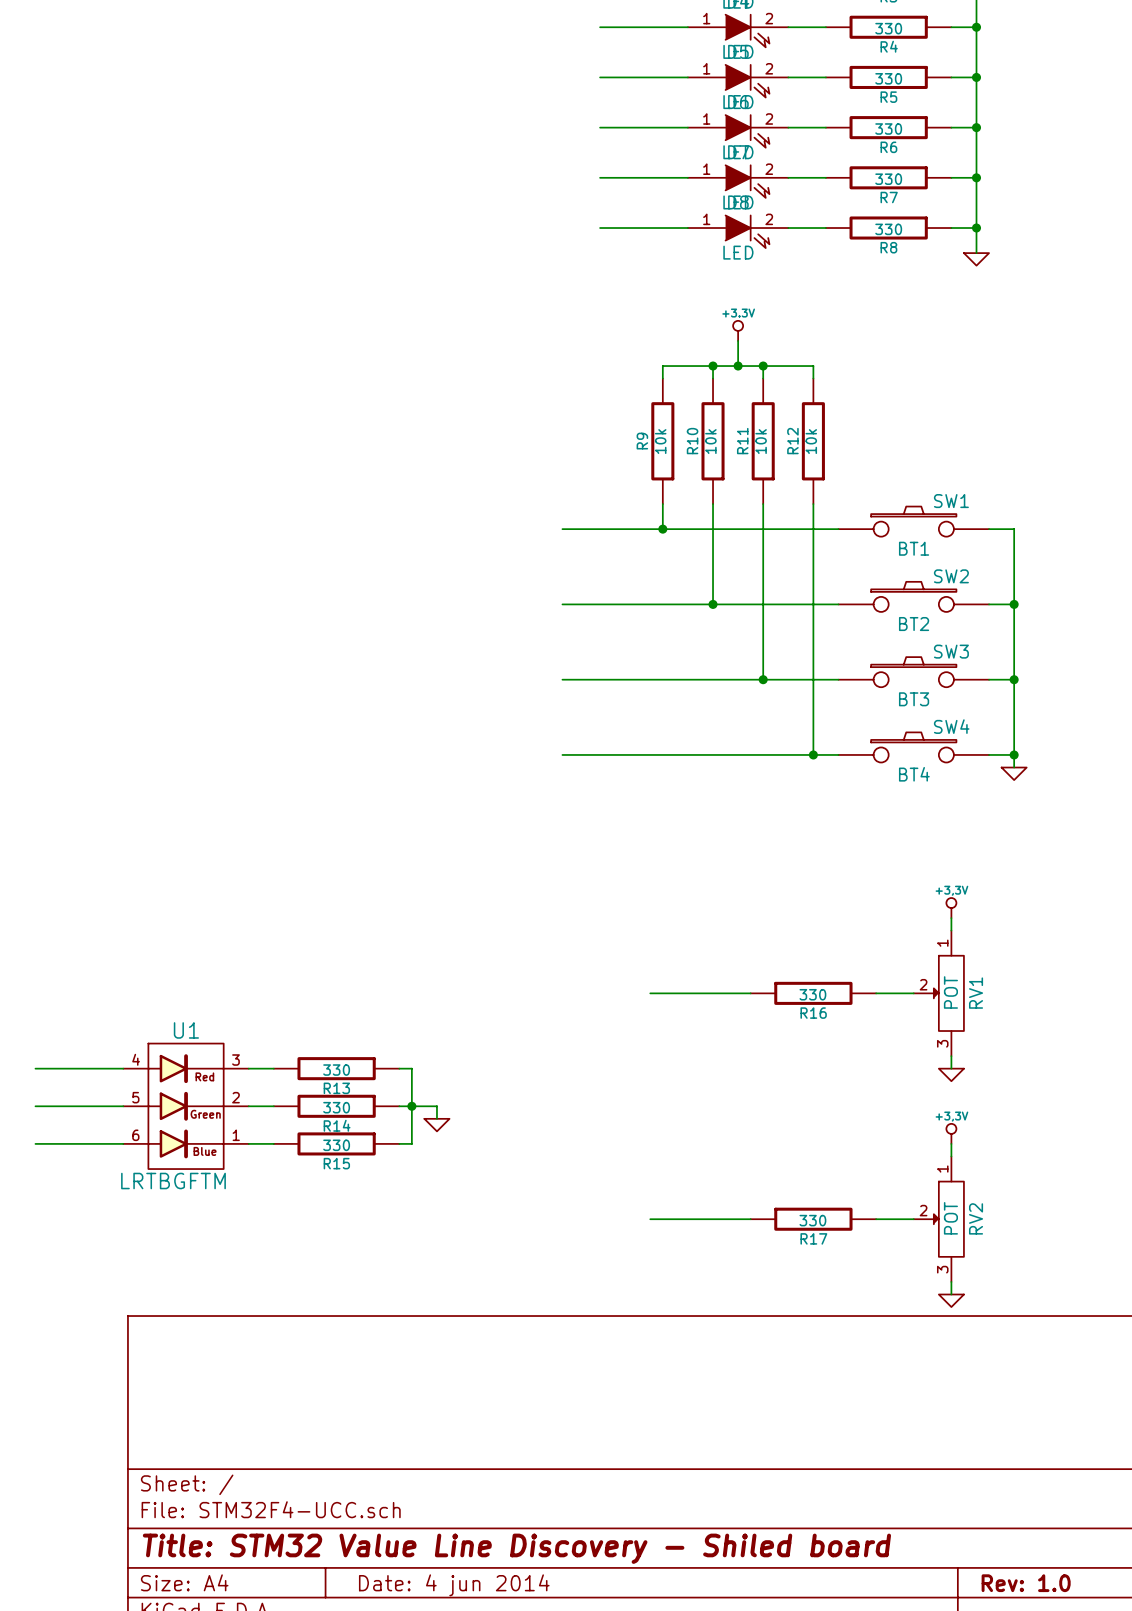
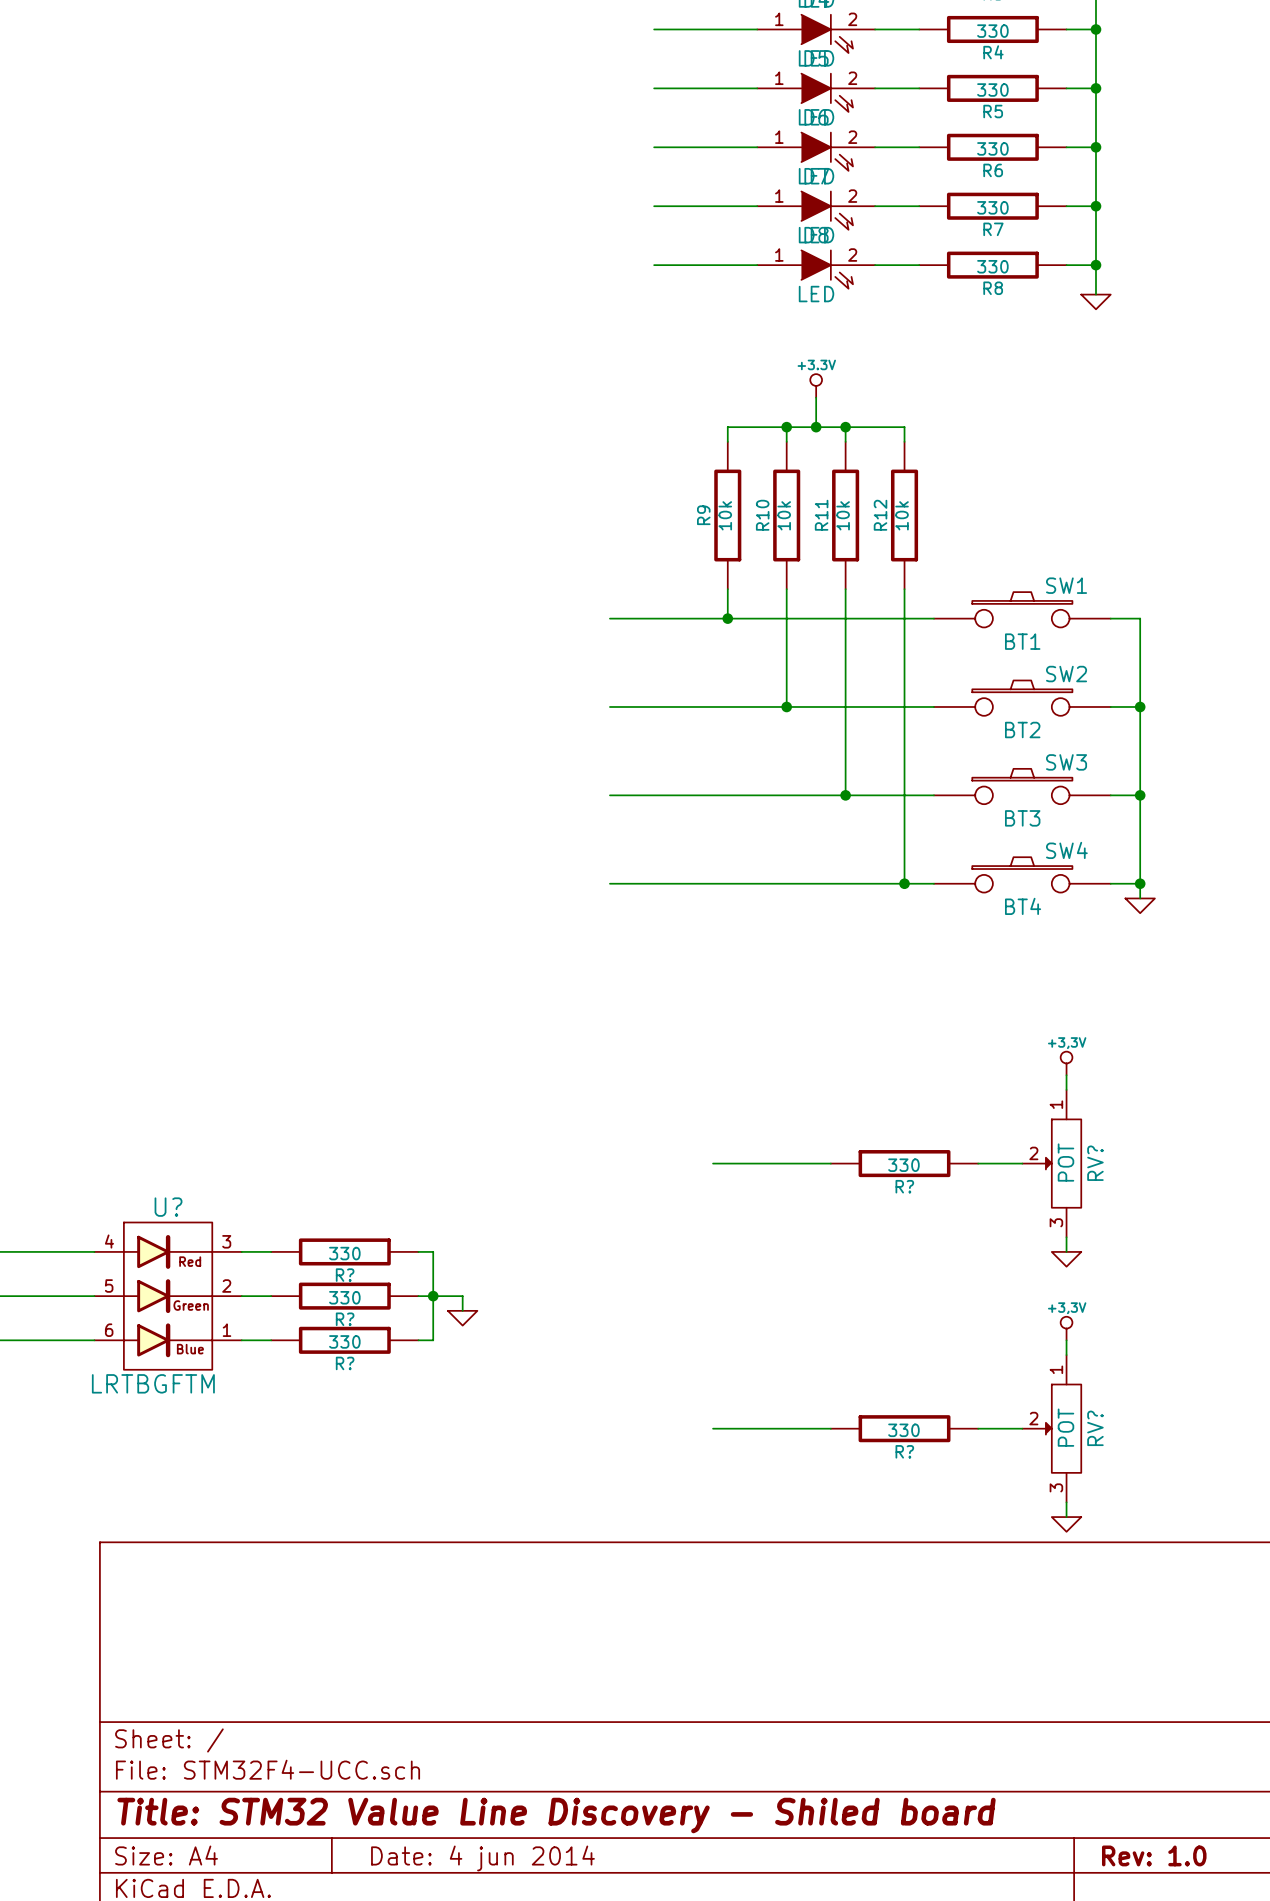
RV1 name: RV1 (976, 993) -> RV? (1095, 1163)
R16 name: R16 (813, 1013) -> R? (904, 1186)
U1 name: U1 (186, 1030) -> U? (168, 1207)
R13 name: R13 (336, 1088) -> R? (345, 1275)
R14 name: R14 (337, 1125) -> R? (345, 1319)
R15 name: R15 (336, 1163) -> R? (345, 1363)
RV2 name: RV2 (976, 1218) -> RV? (1095, 1428)
R17 name: R17 (813, 1238) -> R? (904, 1451)

